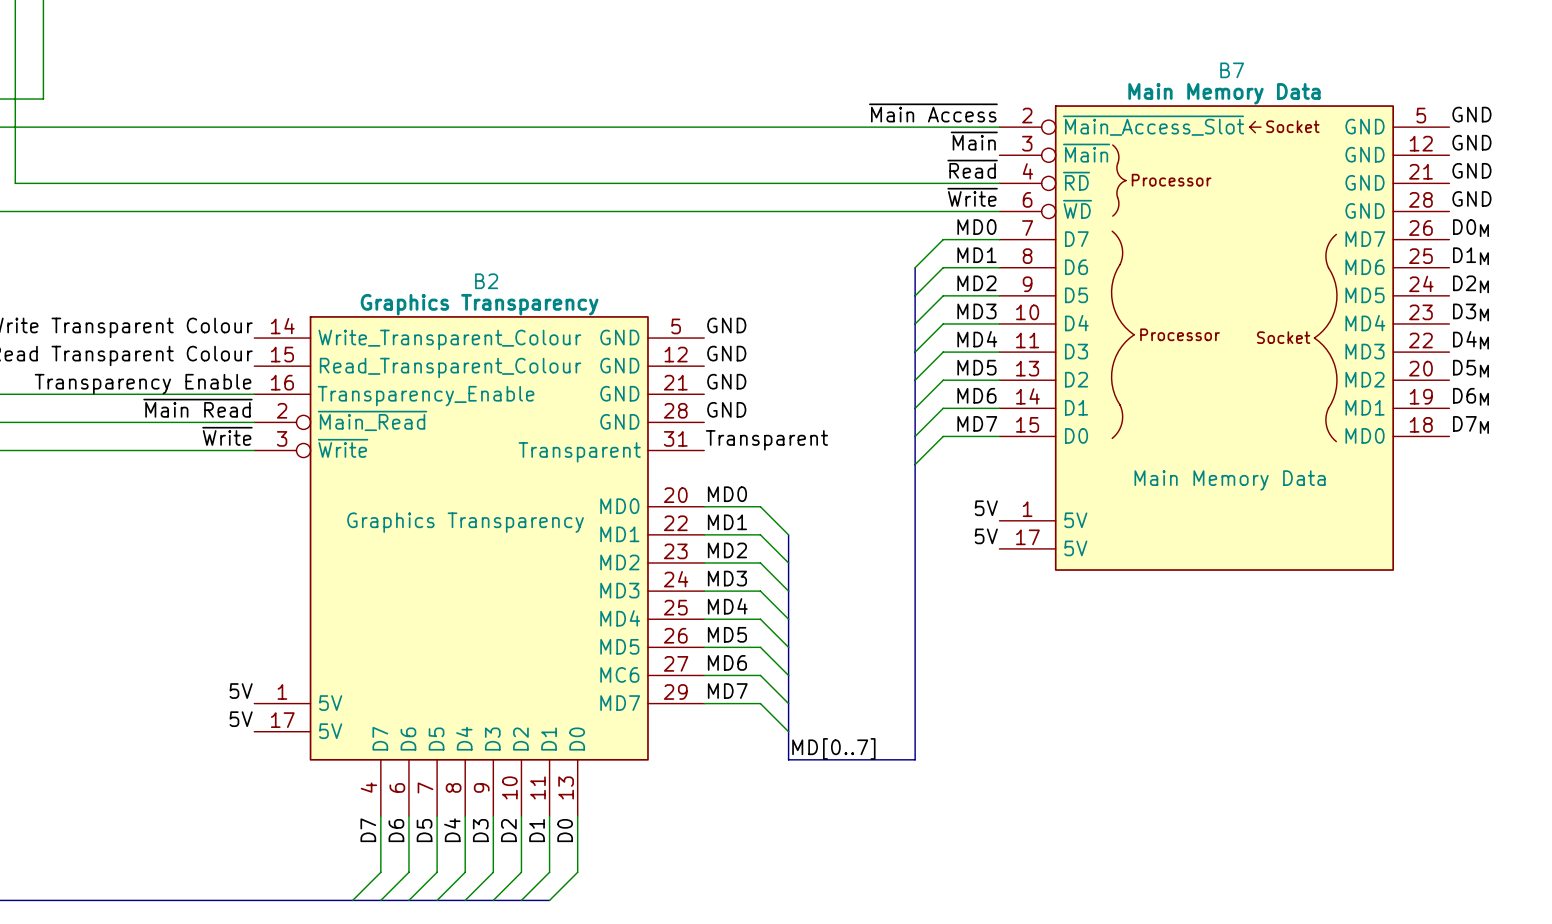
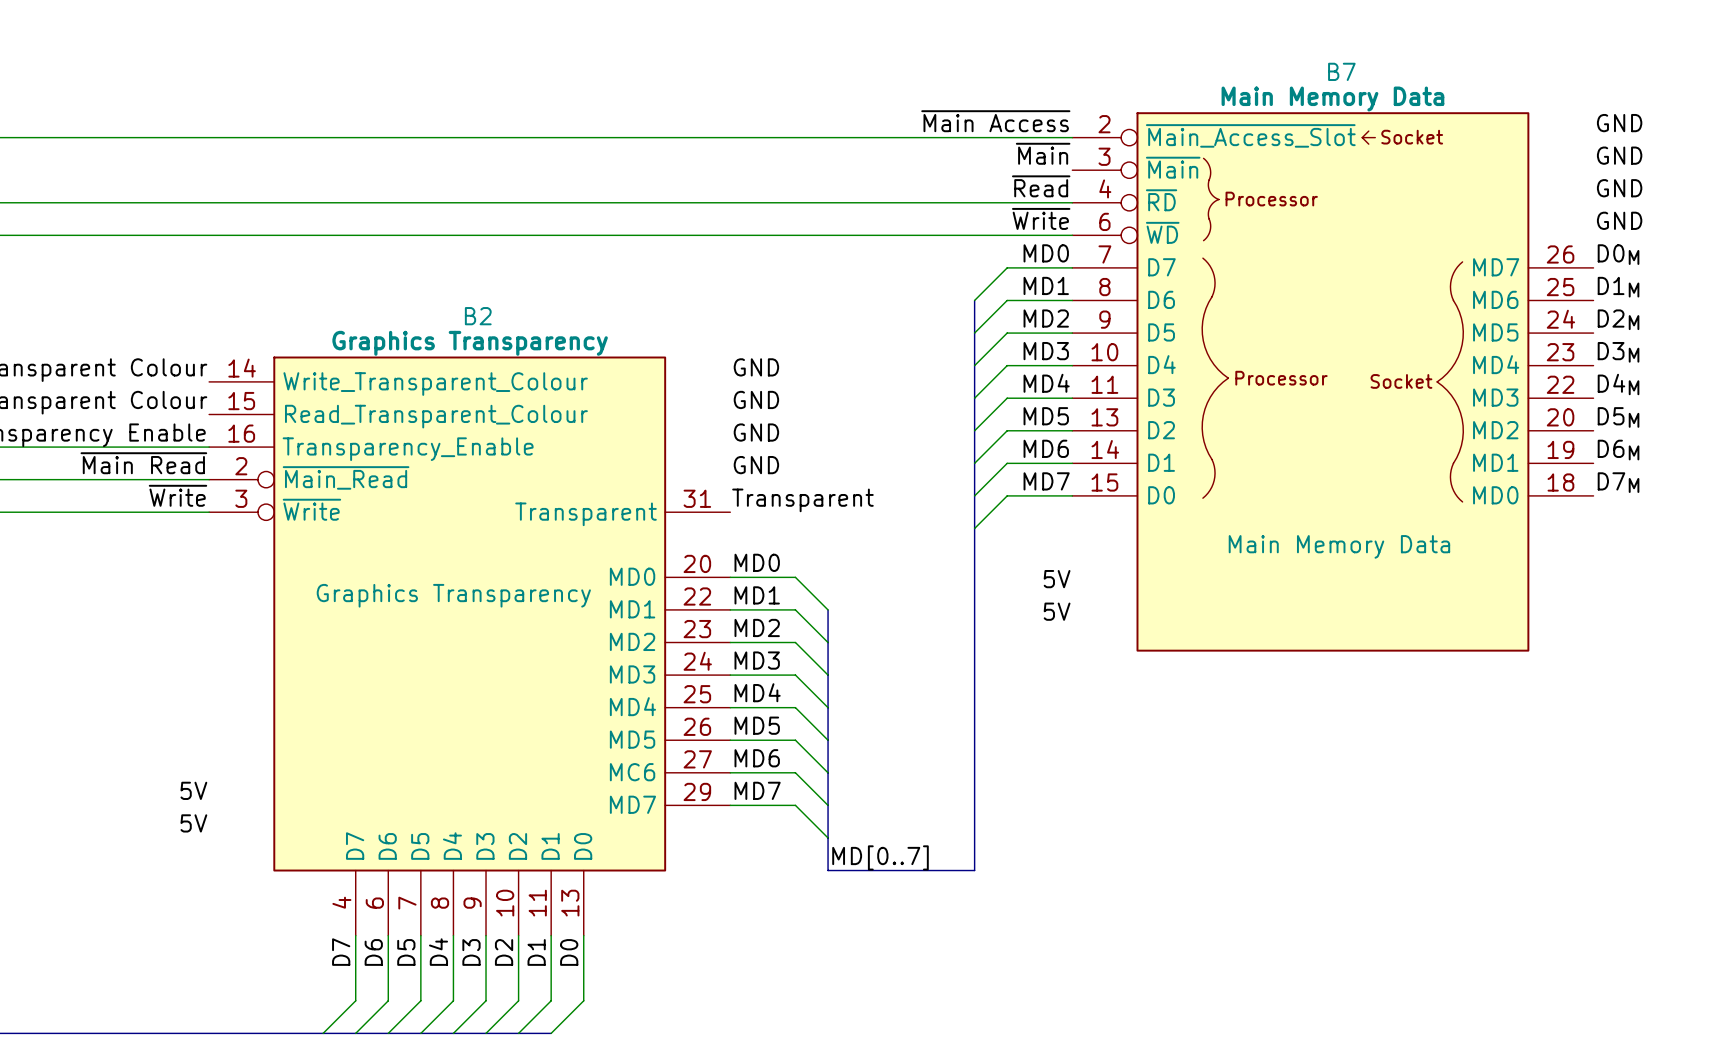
B7 symbol: [999, 105, 1450, 571] -> [1072, 112, 1594, 652]
B2 symbol: [254, 316, 705, 817] -> [209, 356, 731, 936]

